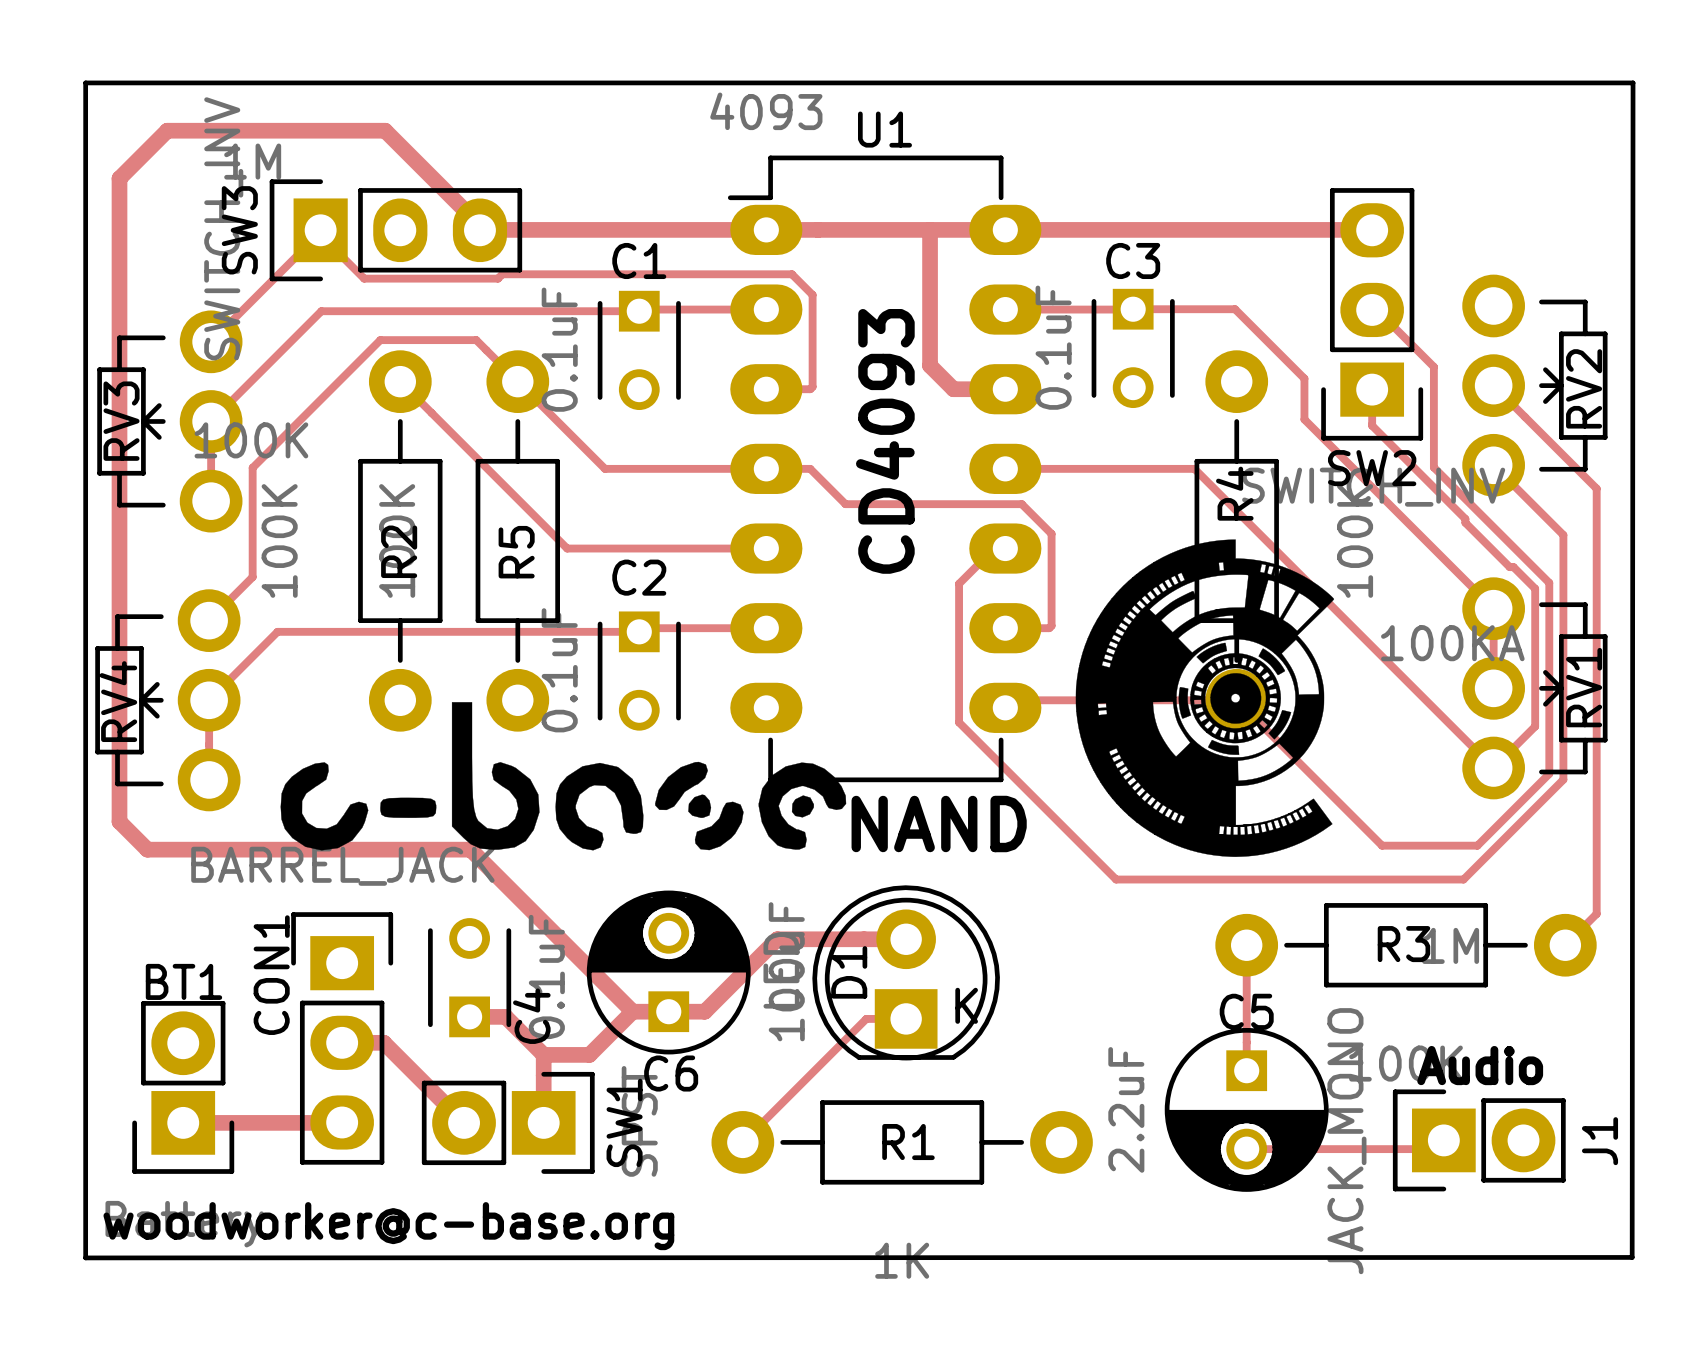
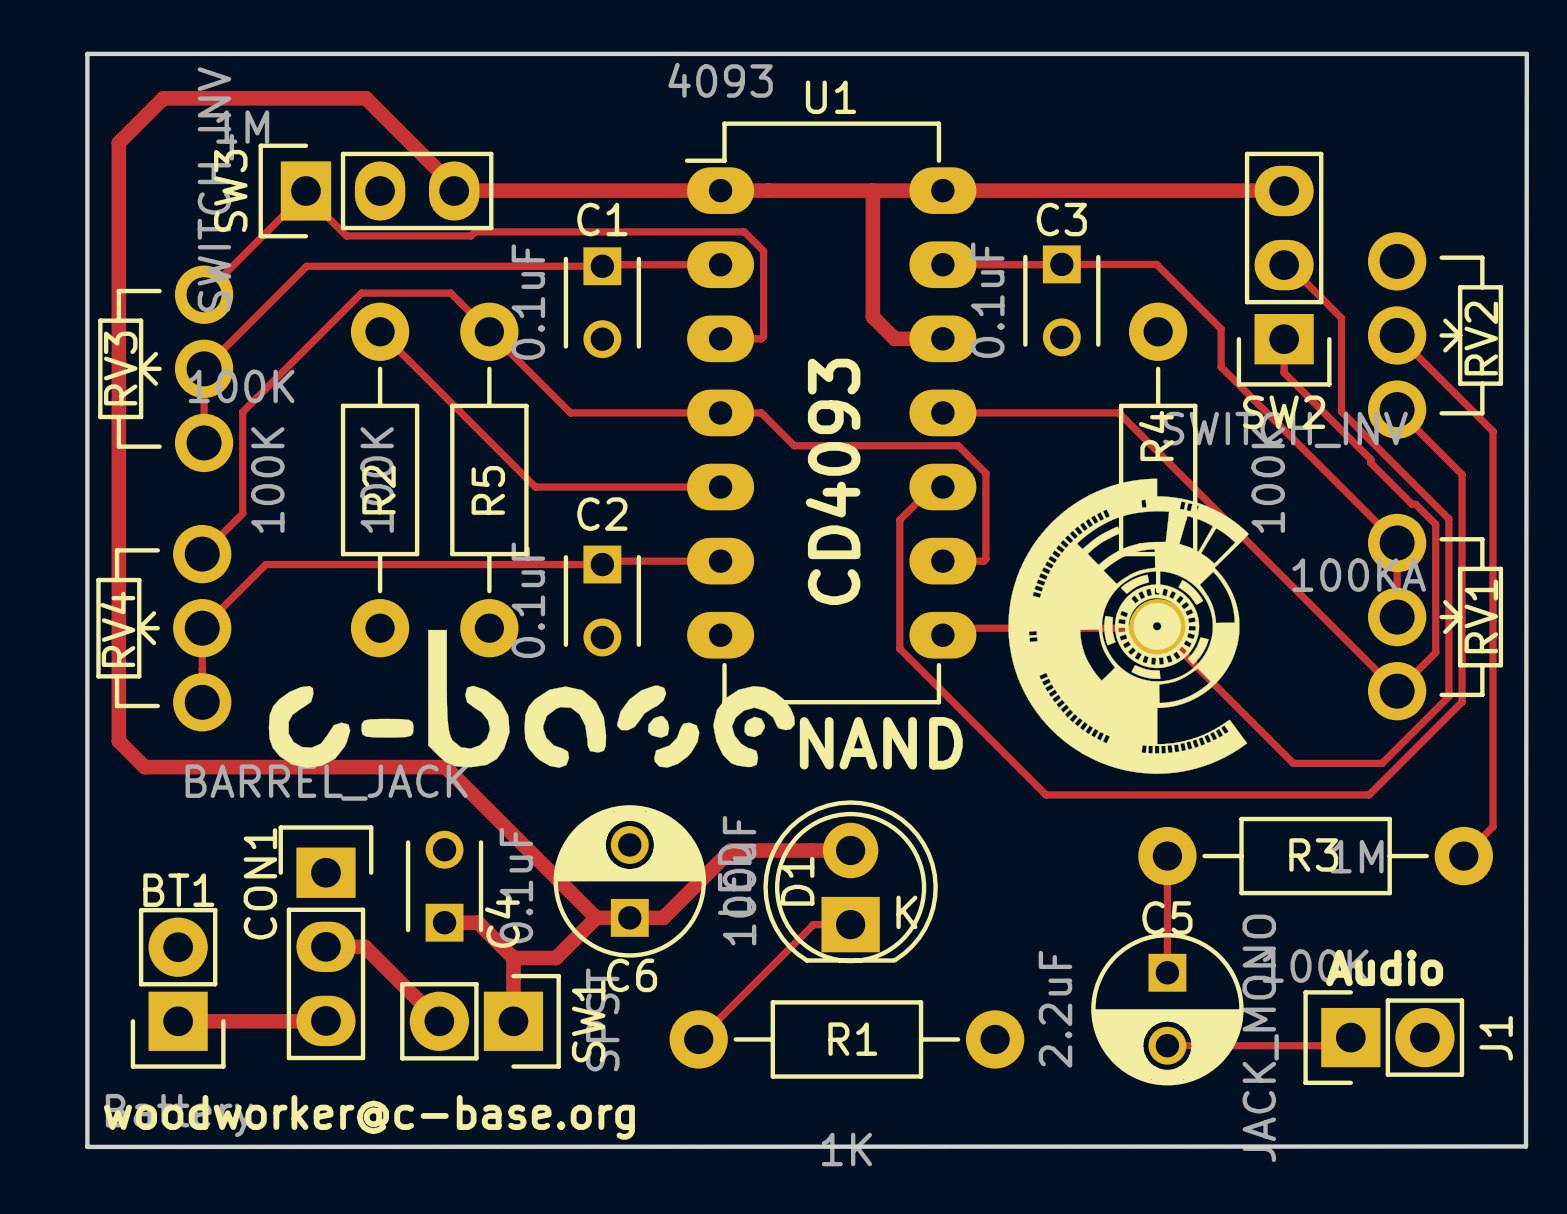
text position: CD4093 (885, 441) -> CD4093 (833, 481)

